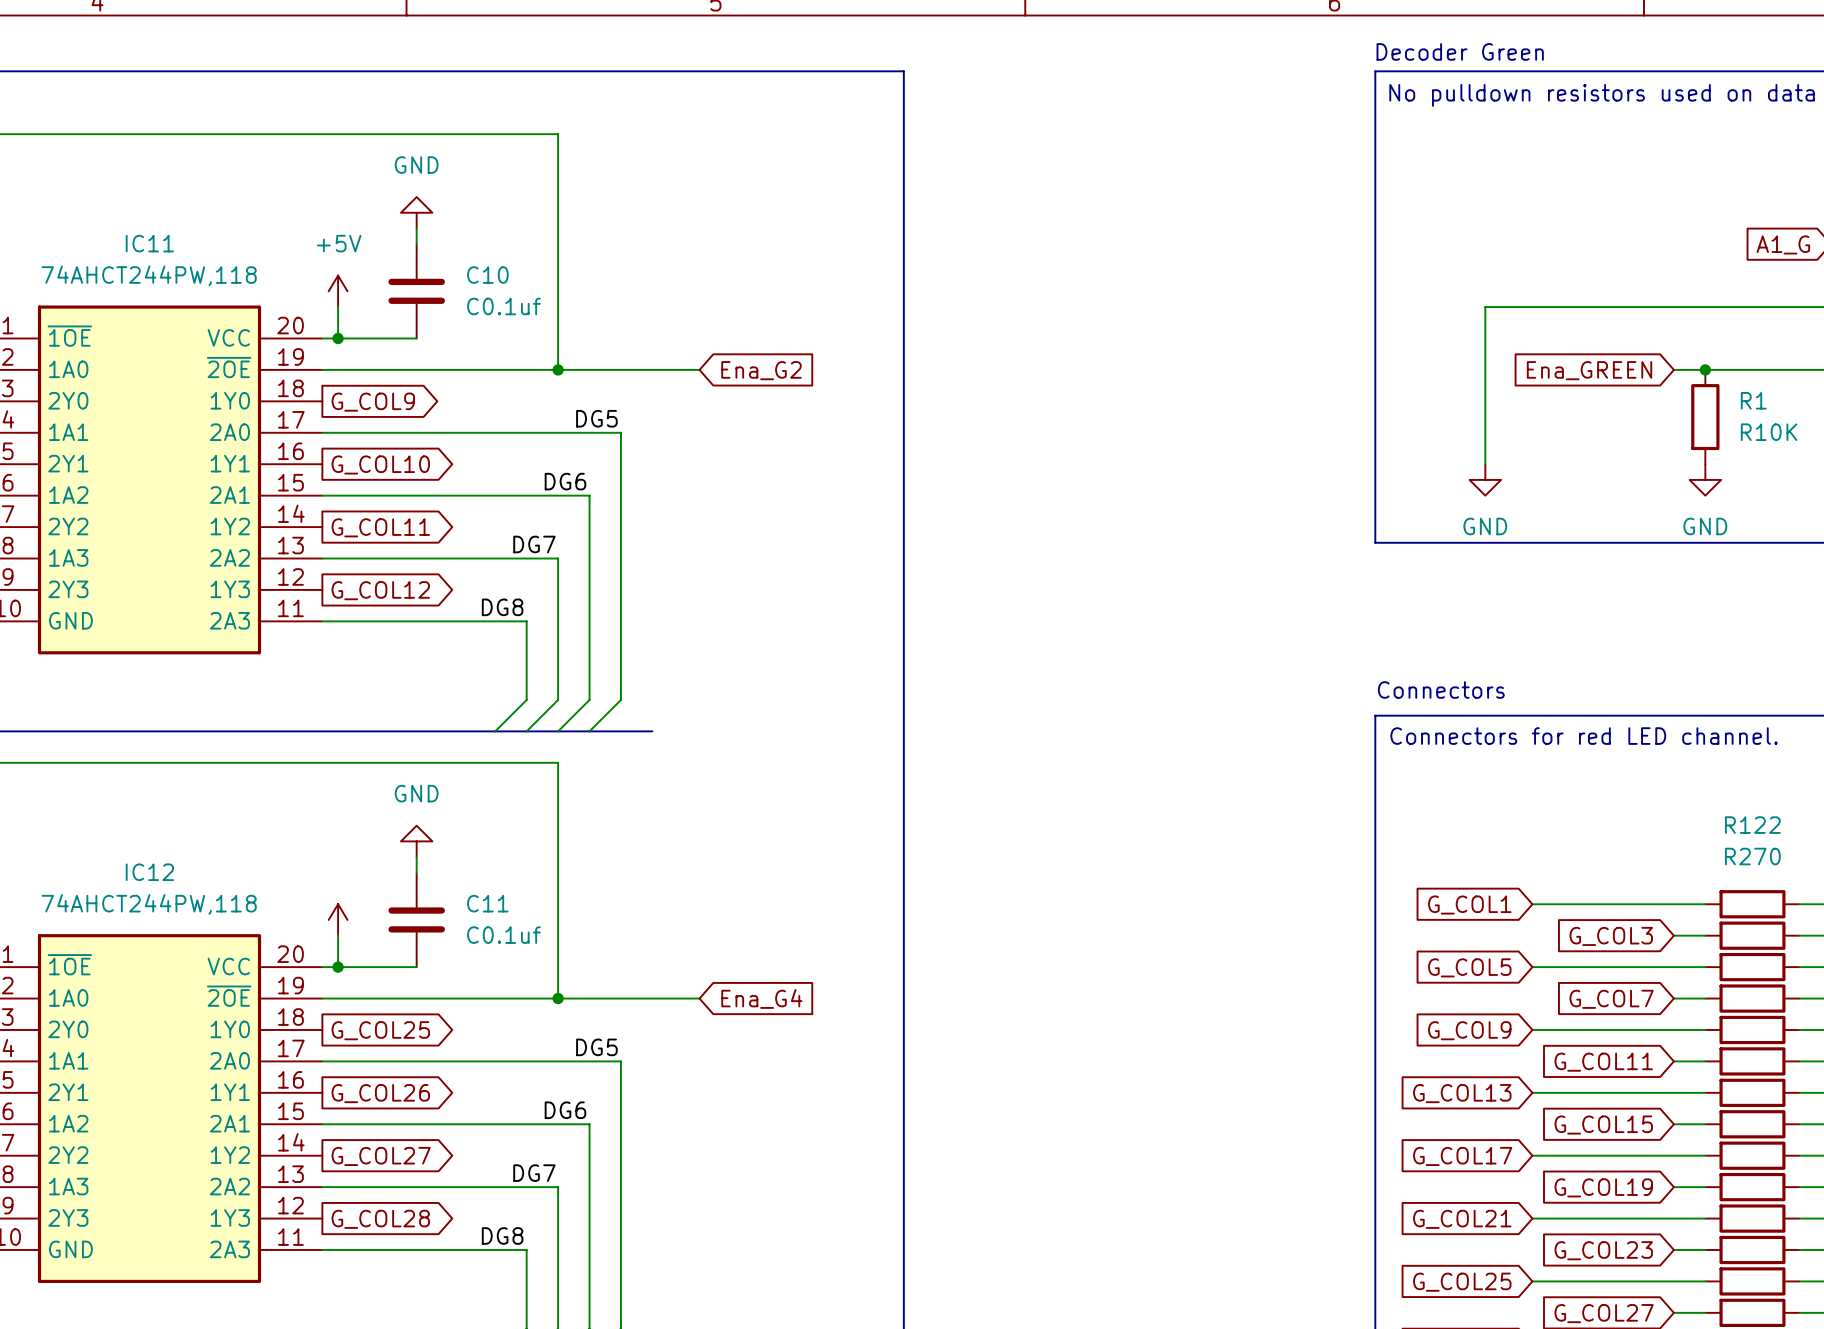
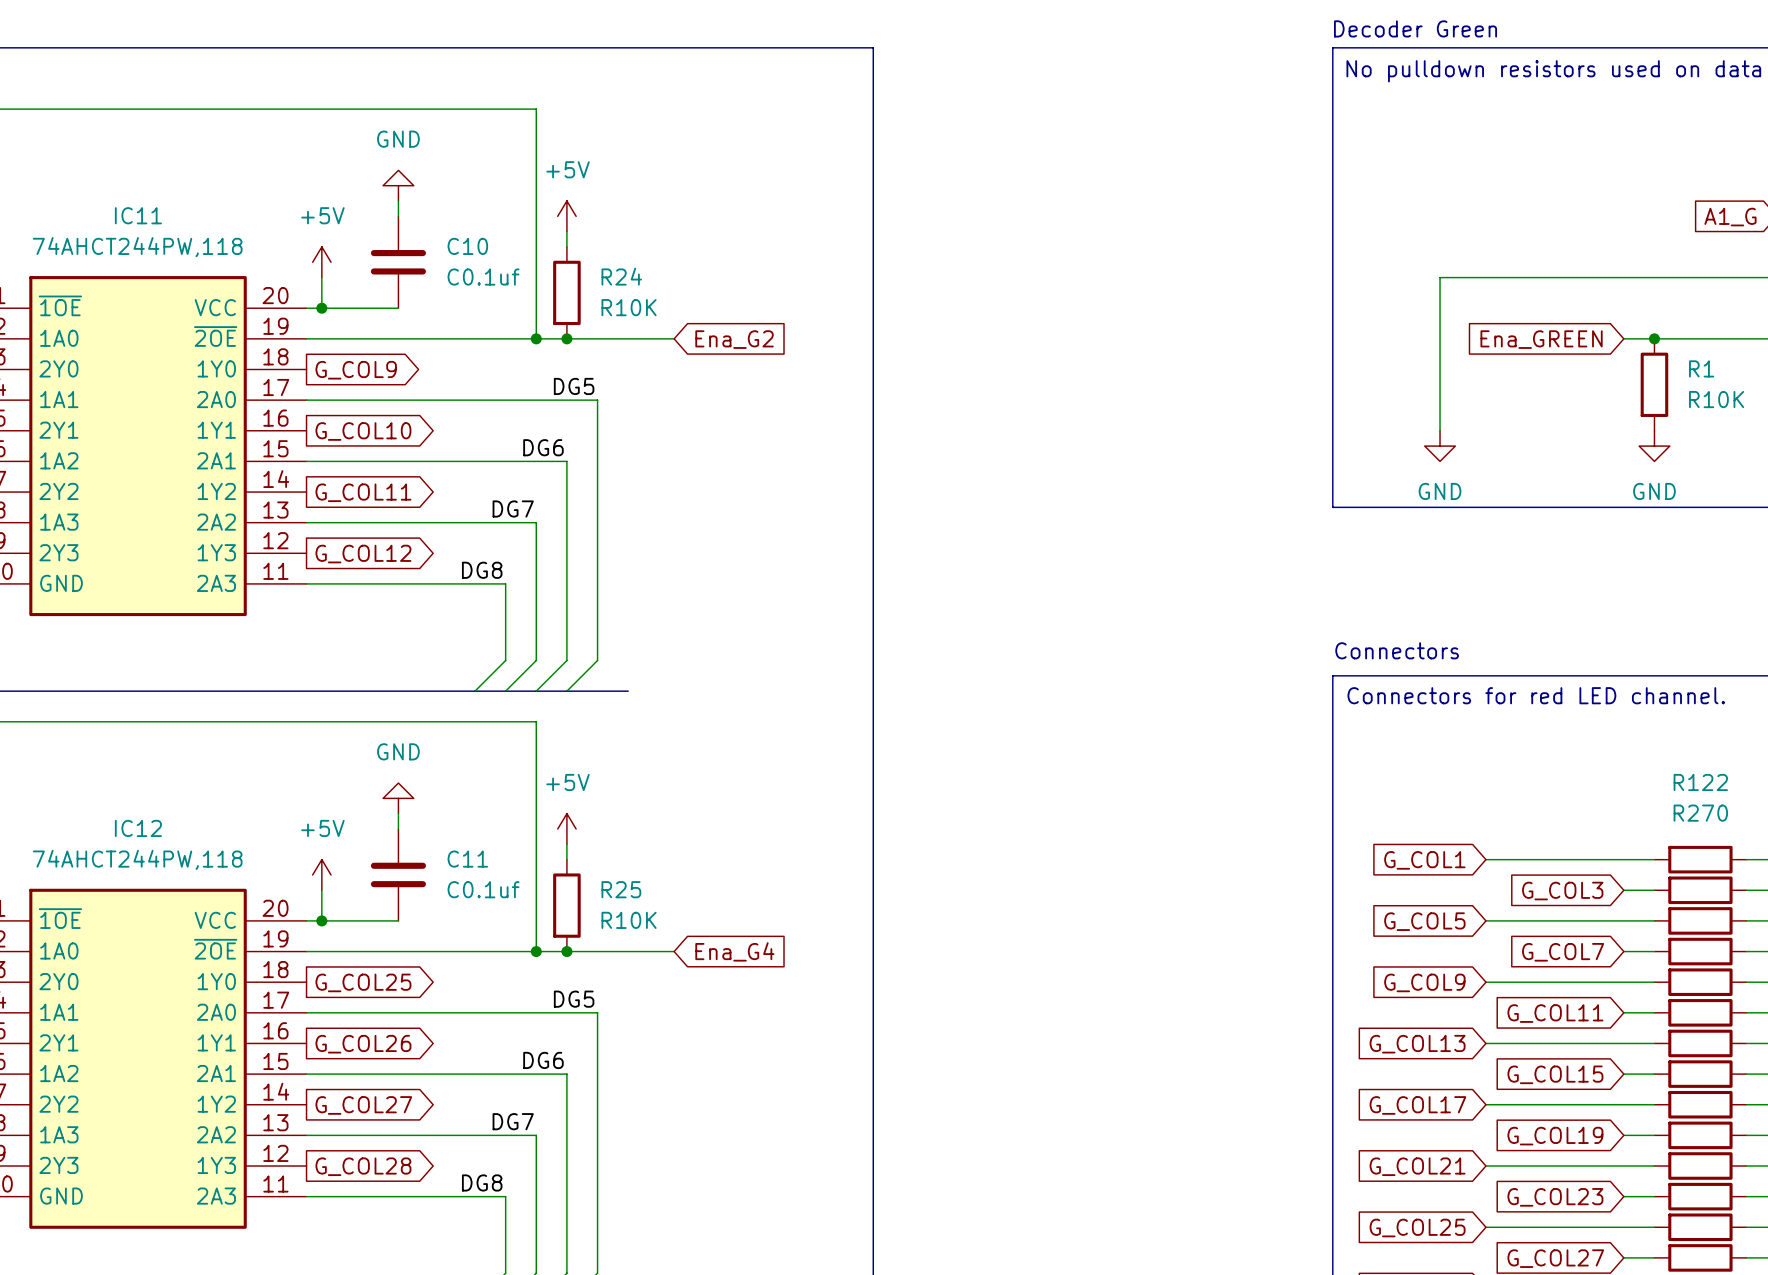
power symbol: none -> +5V (566, 216)
wire: none -> (566, 231) (566, 246)
R24: none -> R10K (566, 292)
junction: none -> (566, 338)
power symbol text: none -> +5V (322, 828)
power symbol: none -> +5V (566, 829)
wire: none -> (566, 844) (566, 859)
R25: none -> R10K (566, 905)
junction: none -> (566, 951)

